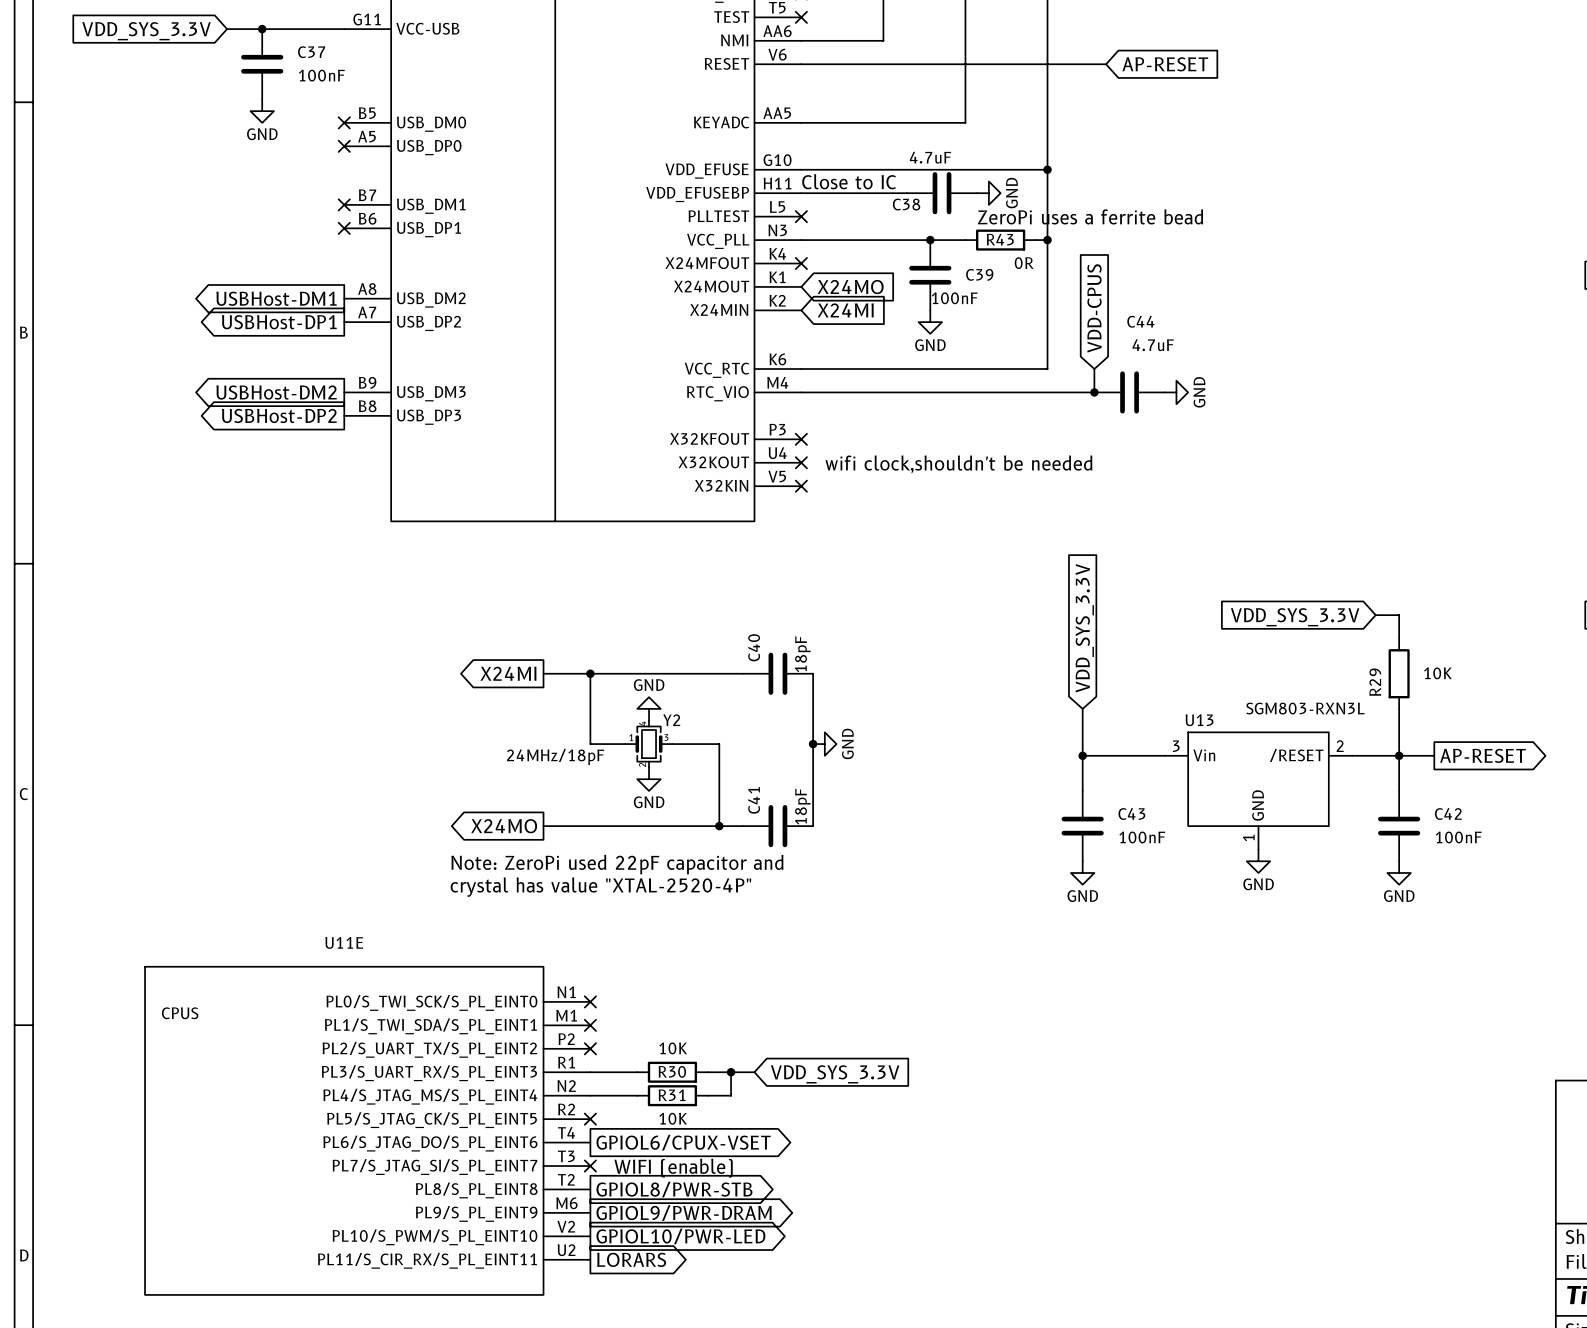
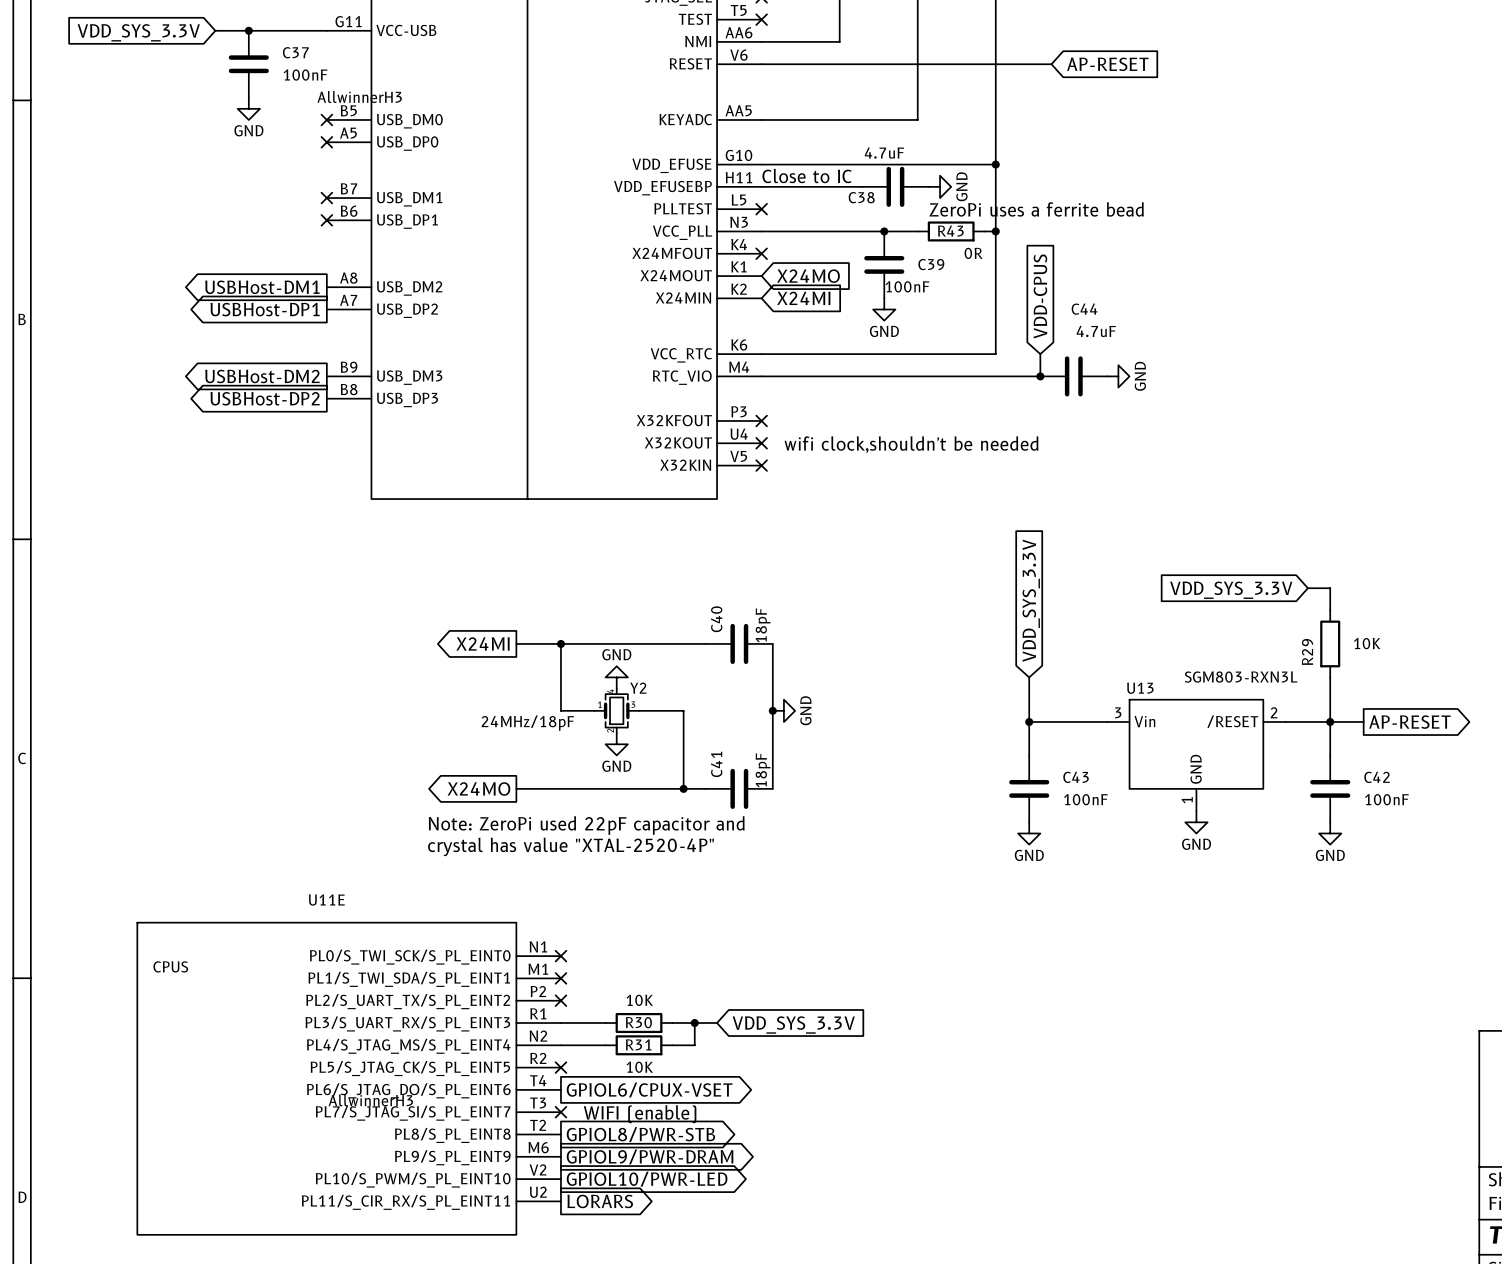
part value: none -> AllwinnerH3 (359, 96)
U11E value: none -> AllwinnerH3 (370, 1100)

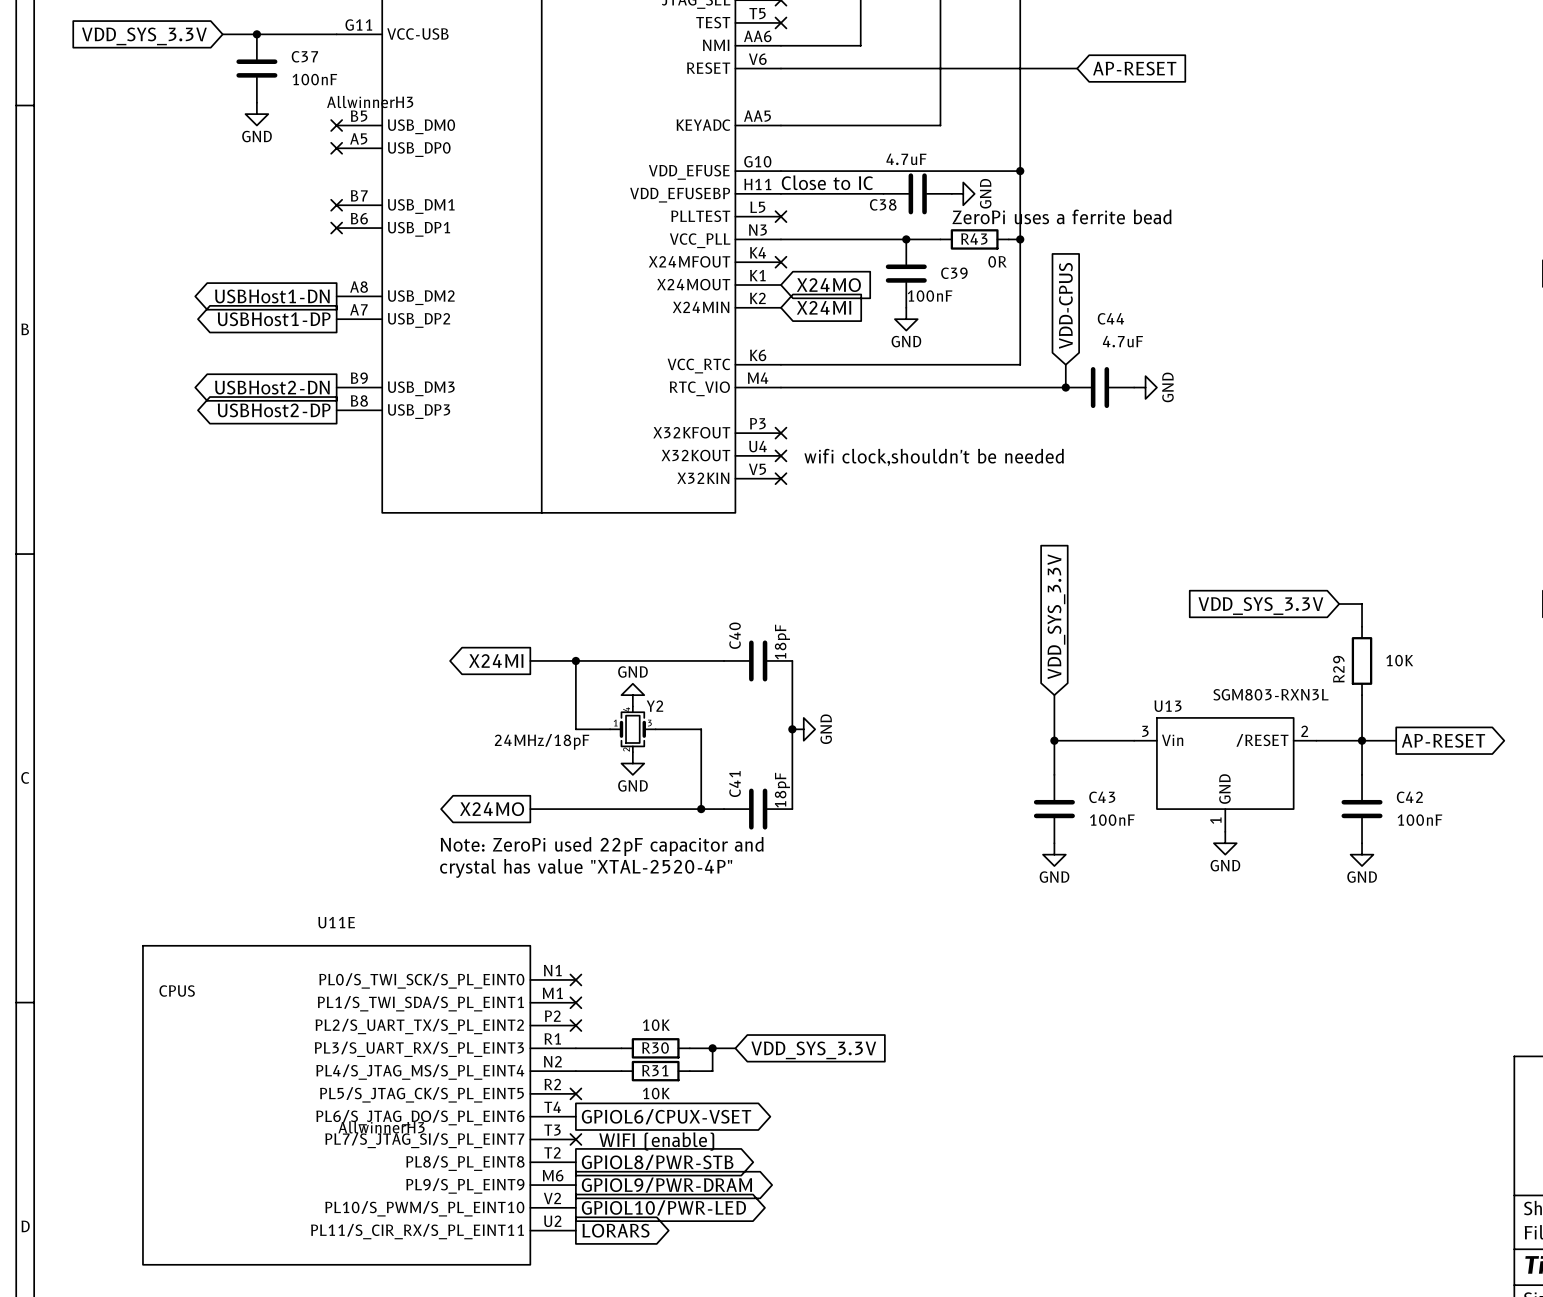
global label: USBHost-DM1 (262, 287) -> USBHost1-DN (272, 296)
global label: USBHost-DP1 (265, 309) -> USBHost1-DP (274, 319)
global label: USBHost-DM2 (262, 376) -> USBHost2-DN (272, 387)
global label: USBHost-DP2 (265, 398) -> USBHost2-DP (274, 410)

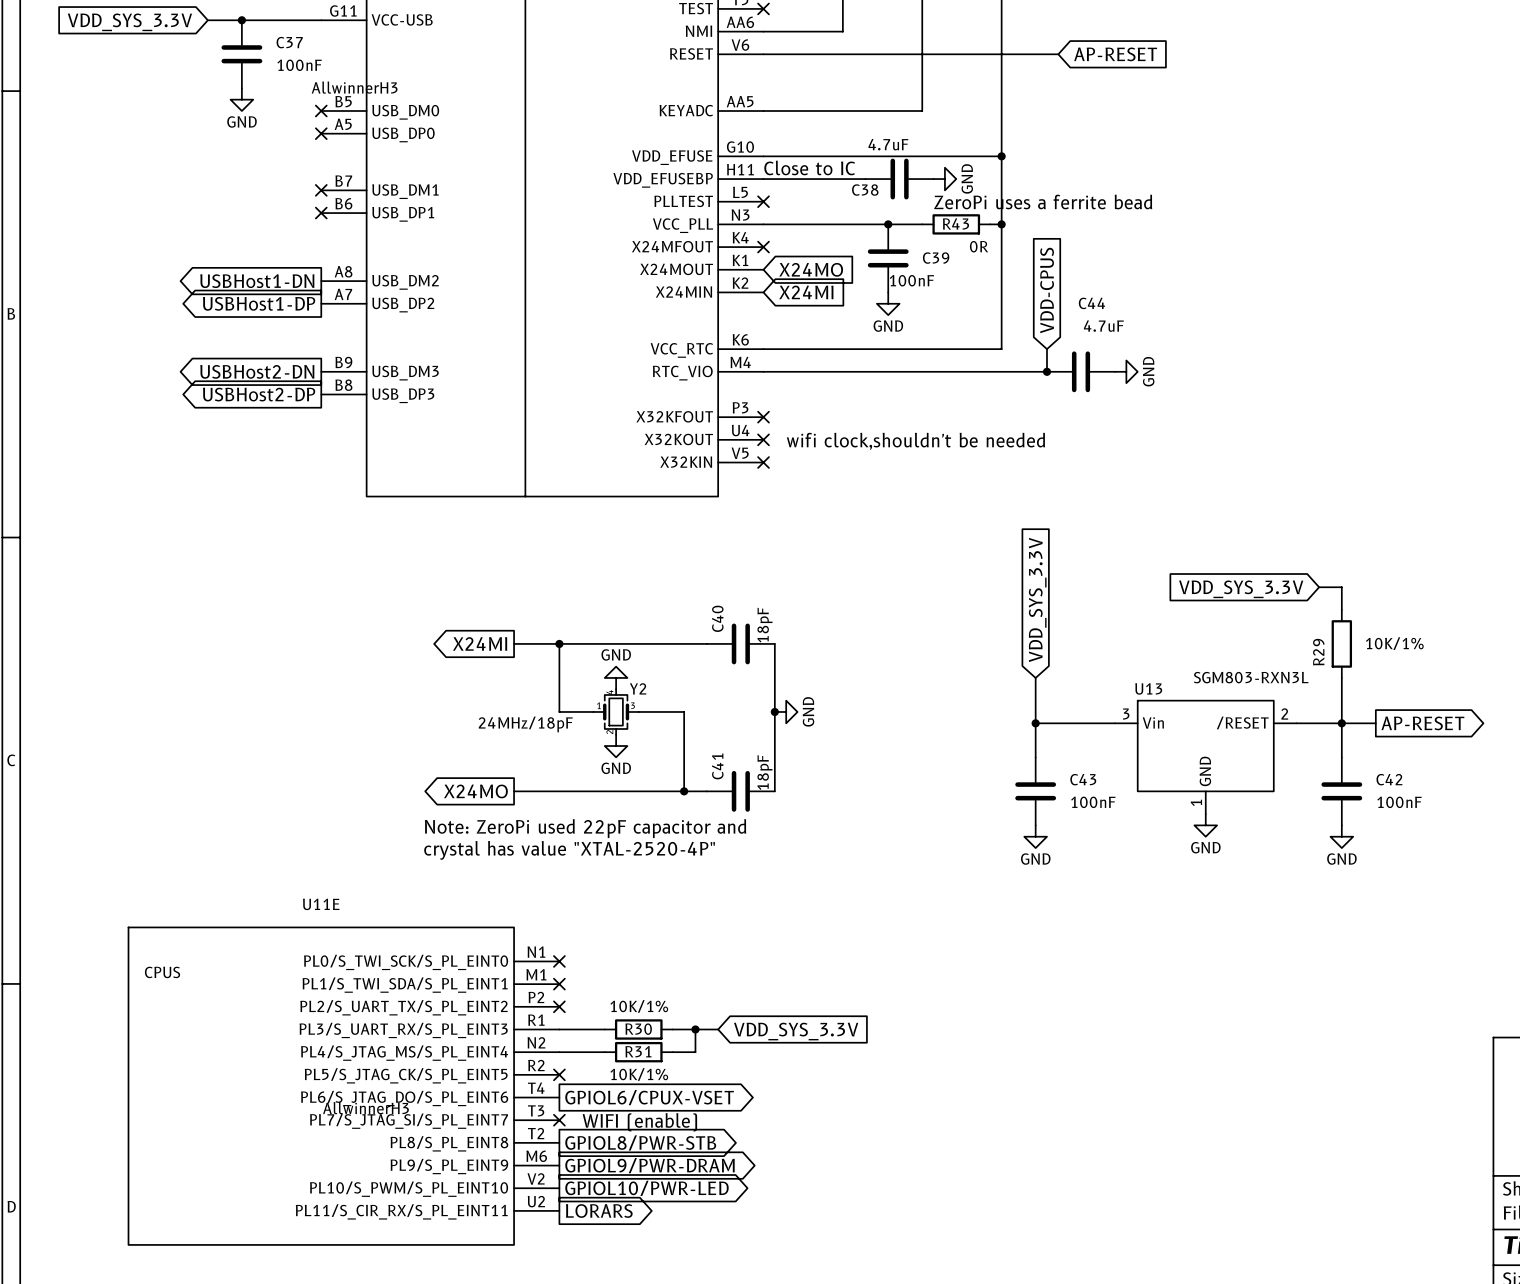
R29 value: 10K (1399, 660) -> 10K/1% (1394, 643)
R30 value: 10K (656, 1025) -> 10K/1% (639, 1006)
R31 value: 10K (656, 1093) -> 10K/1% (639, 1074)

